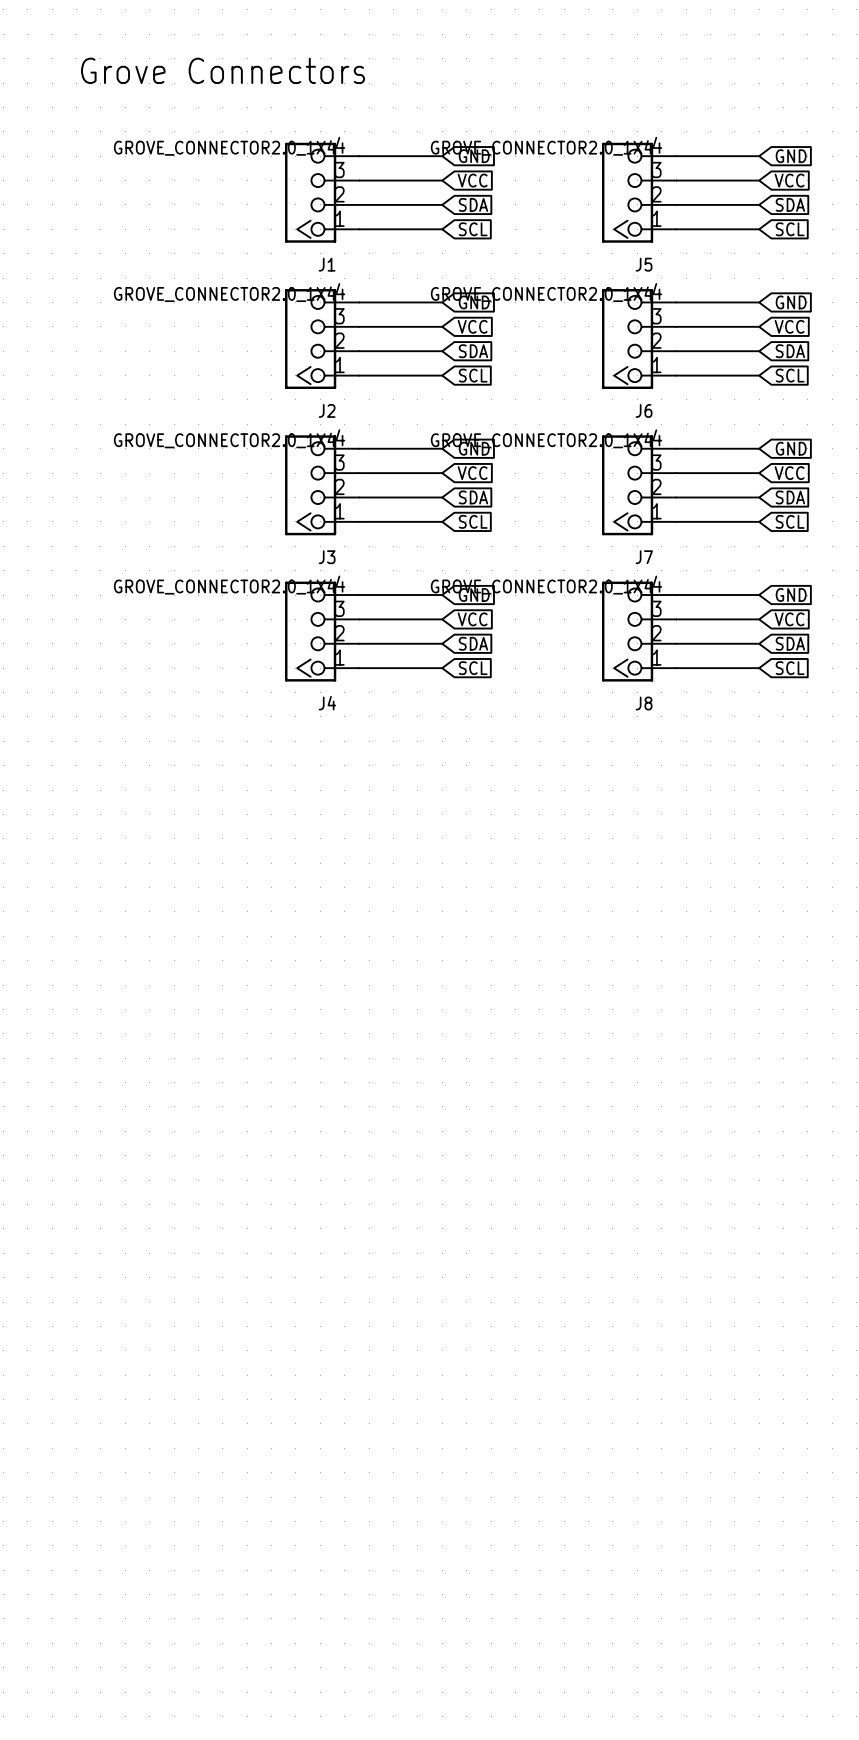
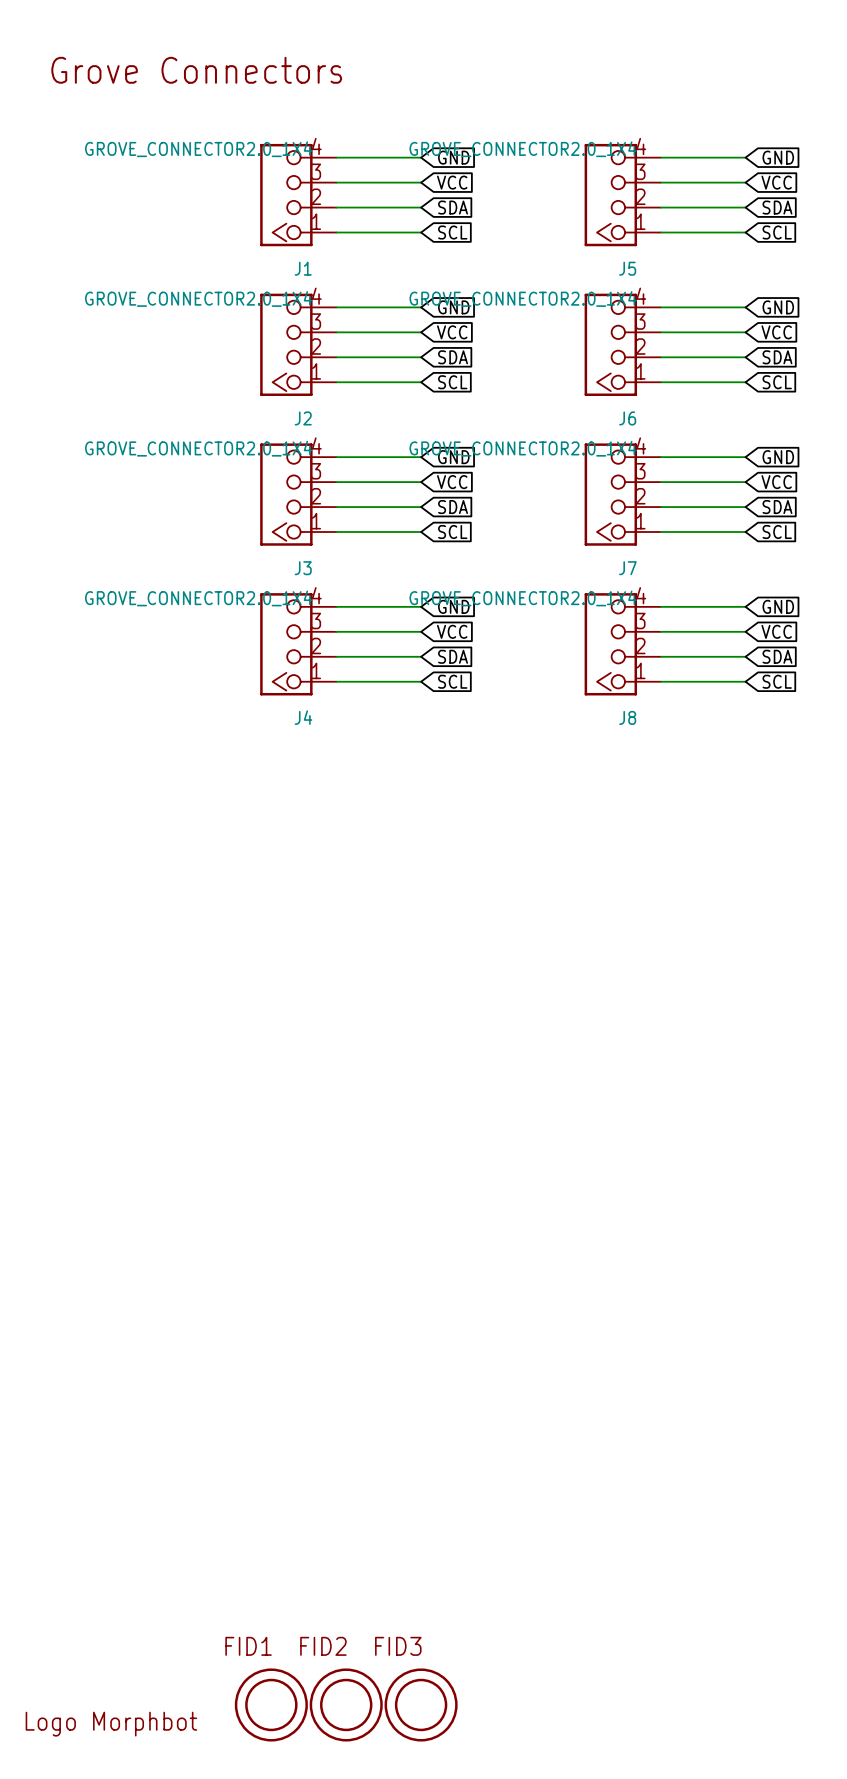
FID1: none -> (271, 1704)
FID2: none -> (346, 1704)
FID3: none -> (421, 1704)
part: none -> (111, 1724)

